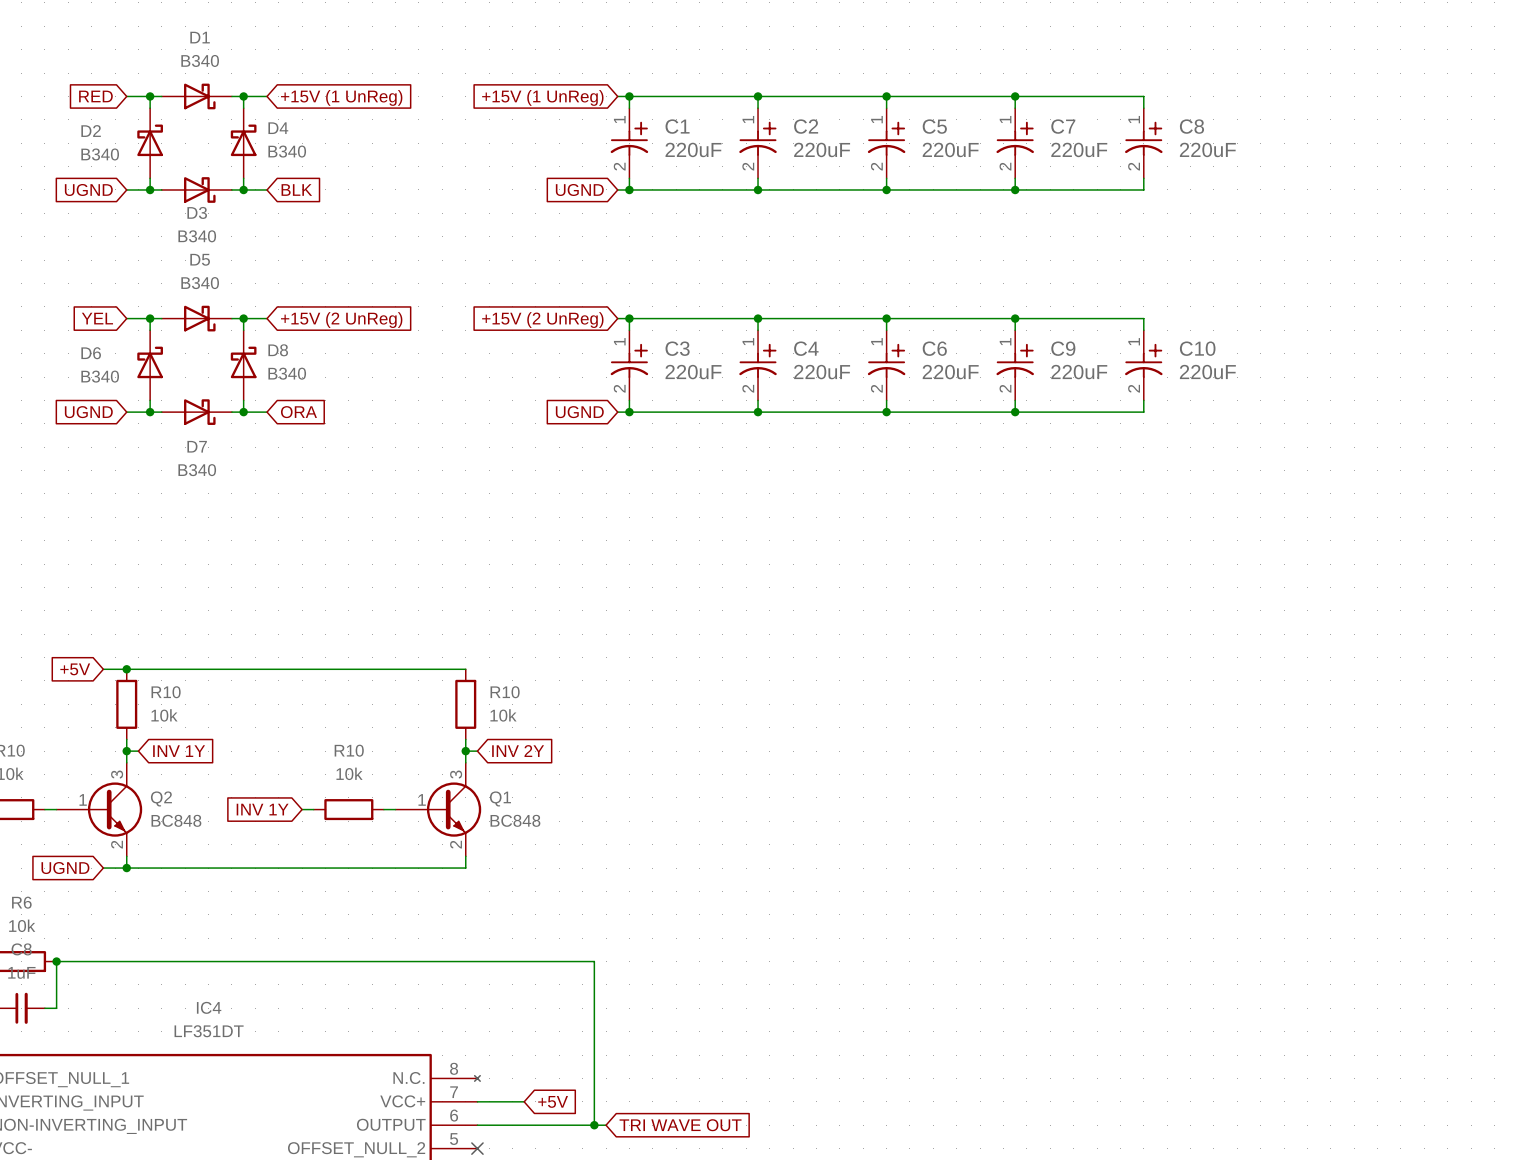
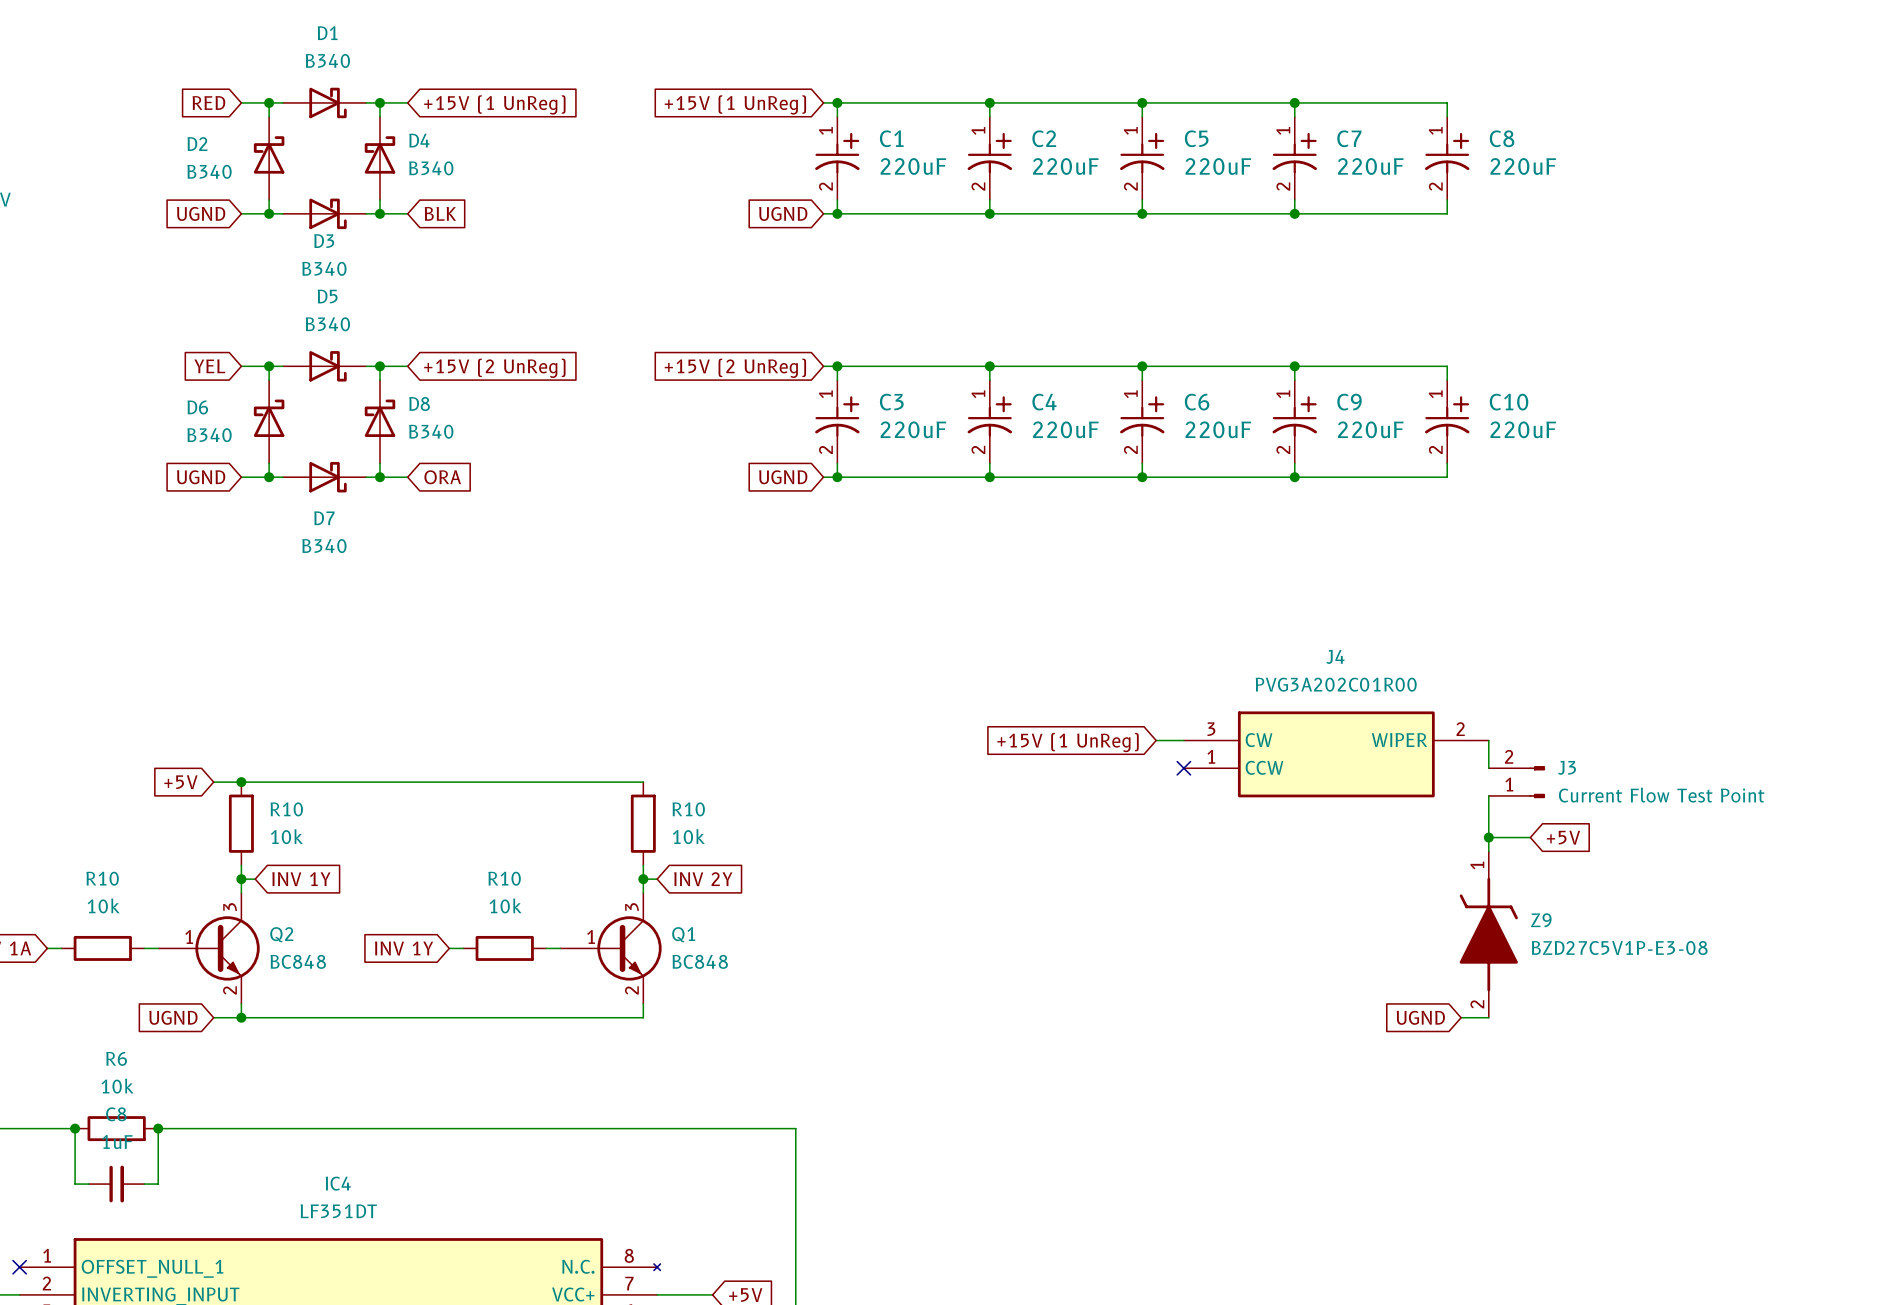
wire: none -> (1156, 740) (1183, 740)
wire: none -> (1488, 740) (1488, 768)
global label: none -> +15V (1 UnReg) (1068, 742)
J4: none -> PVG3A202C01R00 (1336, 754)
no-connect mark: none -> (1183, 768)
J3: none -> Current Flow Test Point (1516, 782)
wire: none -> (1488, 795) (1488, 851)
wire: none -> (1488, 837) (1530, 837)
junction: none -> (1488, 837)
global label: none -> +5V (1563, 837)
Z9: none -> BZD27C5V1P-E3-08 (1488, 934)
global label: none -> UGND (1420, 1017)
wire: none -> (1461, 1017) (1488, 1017)

